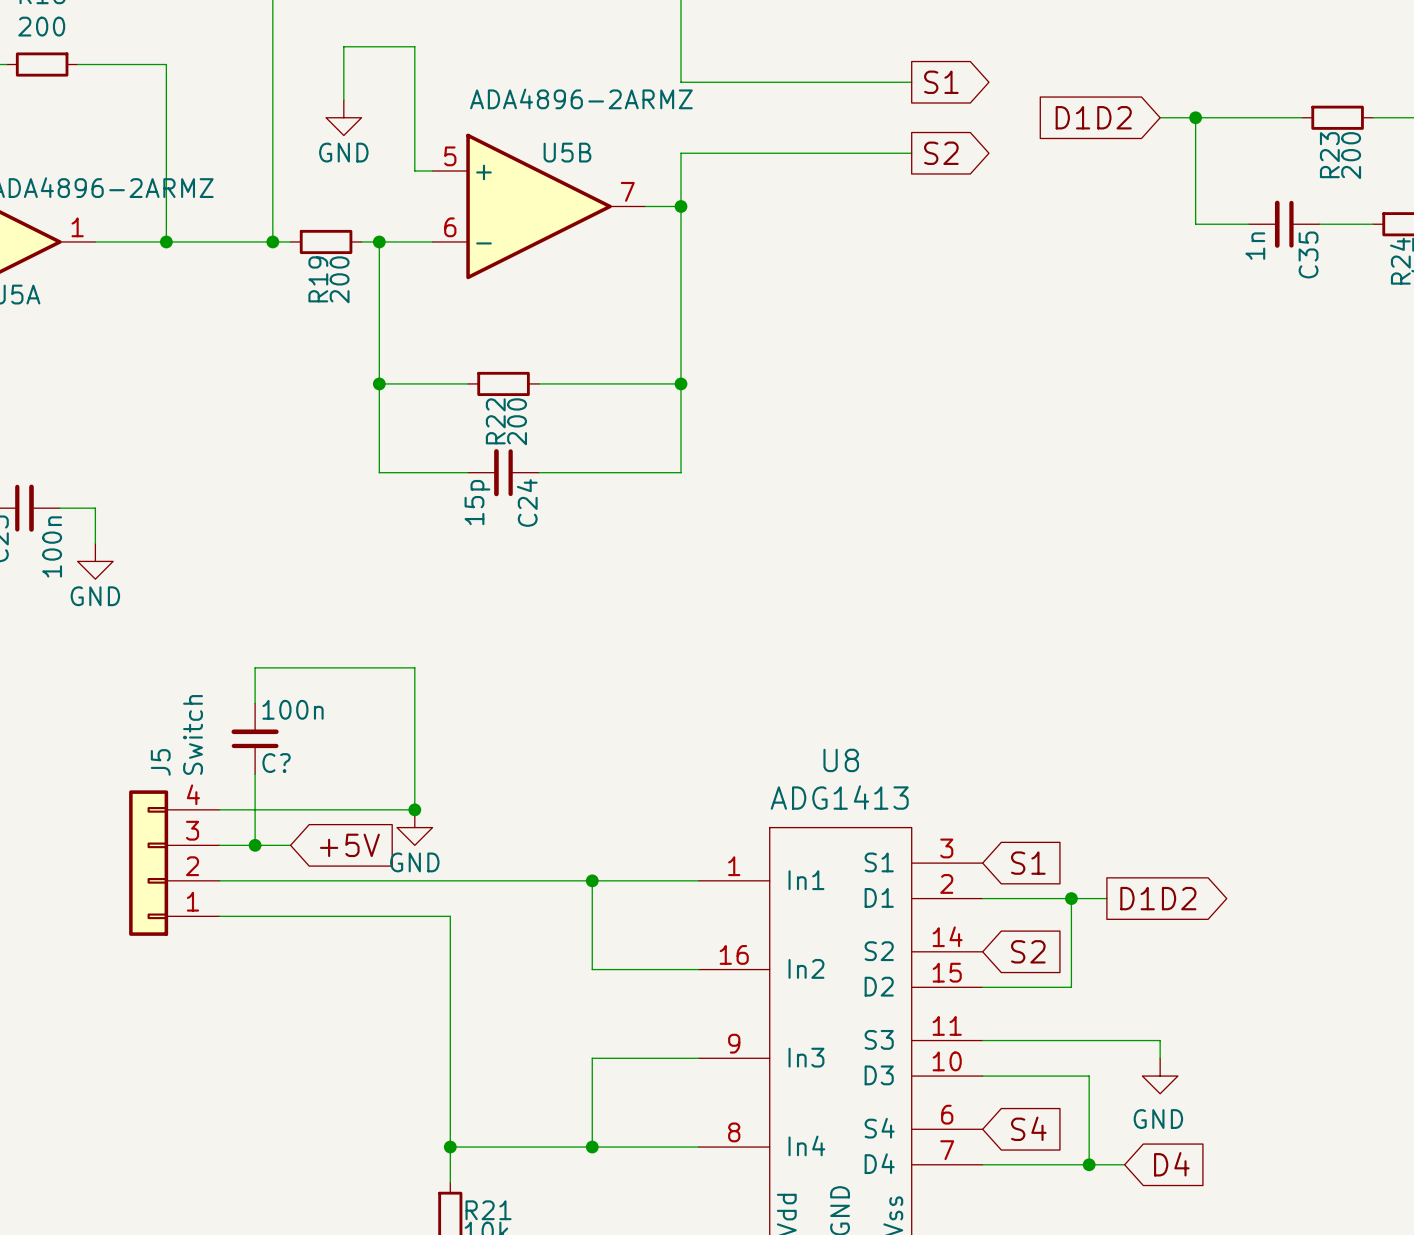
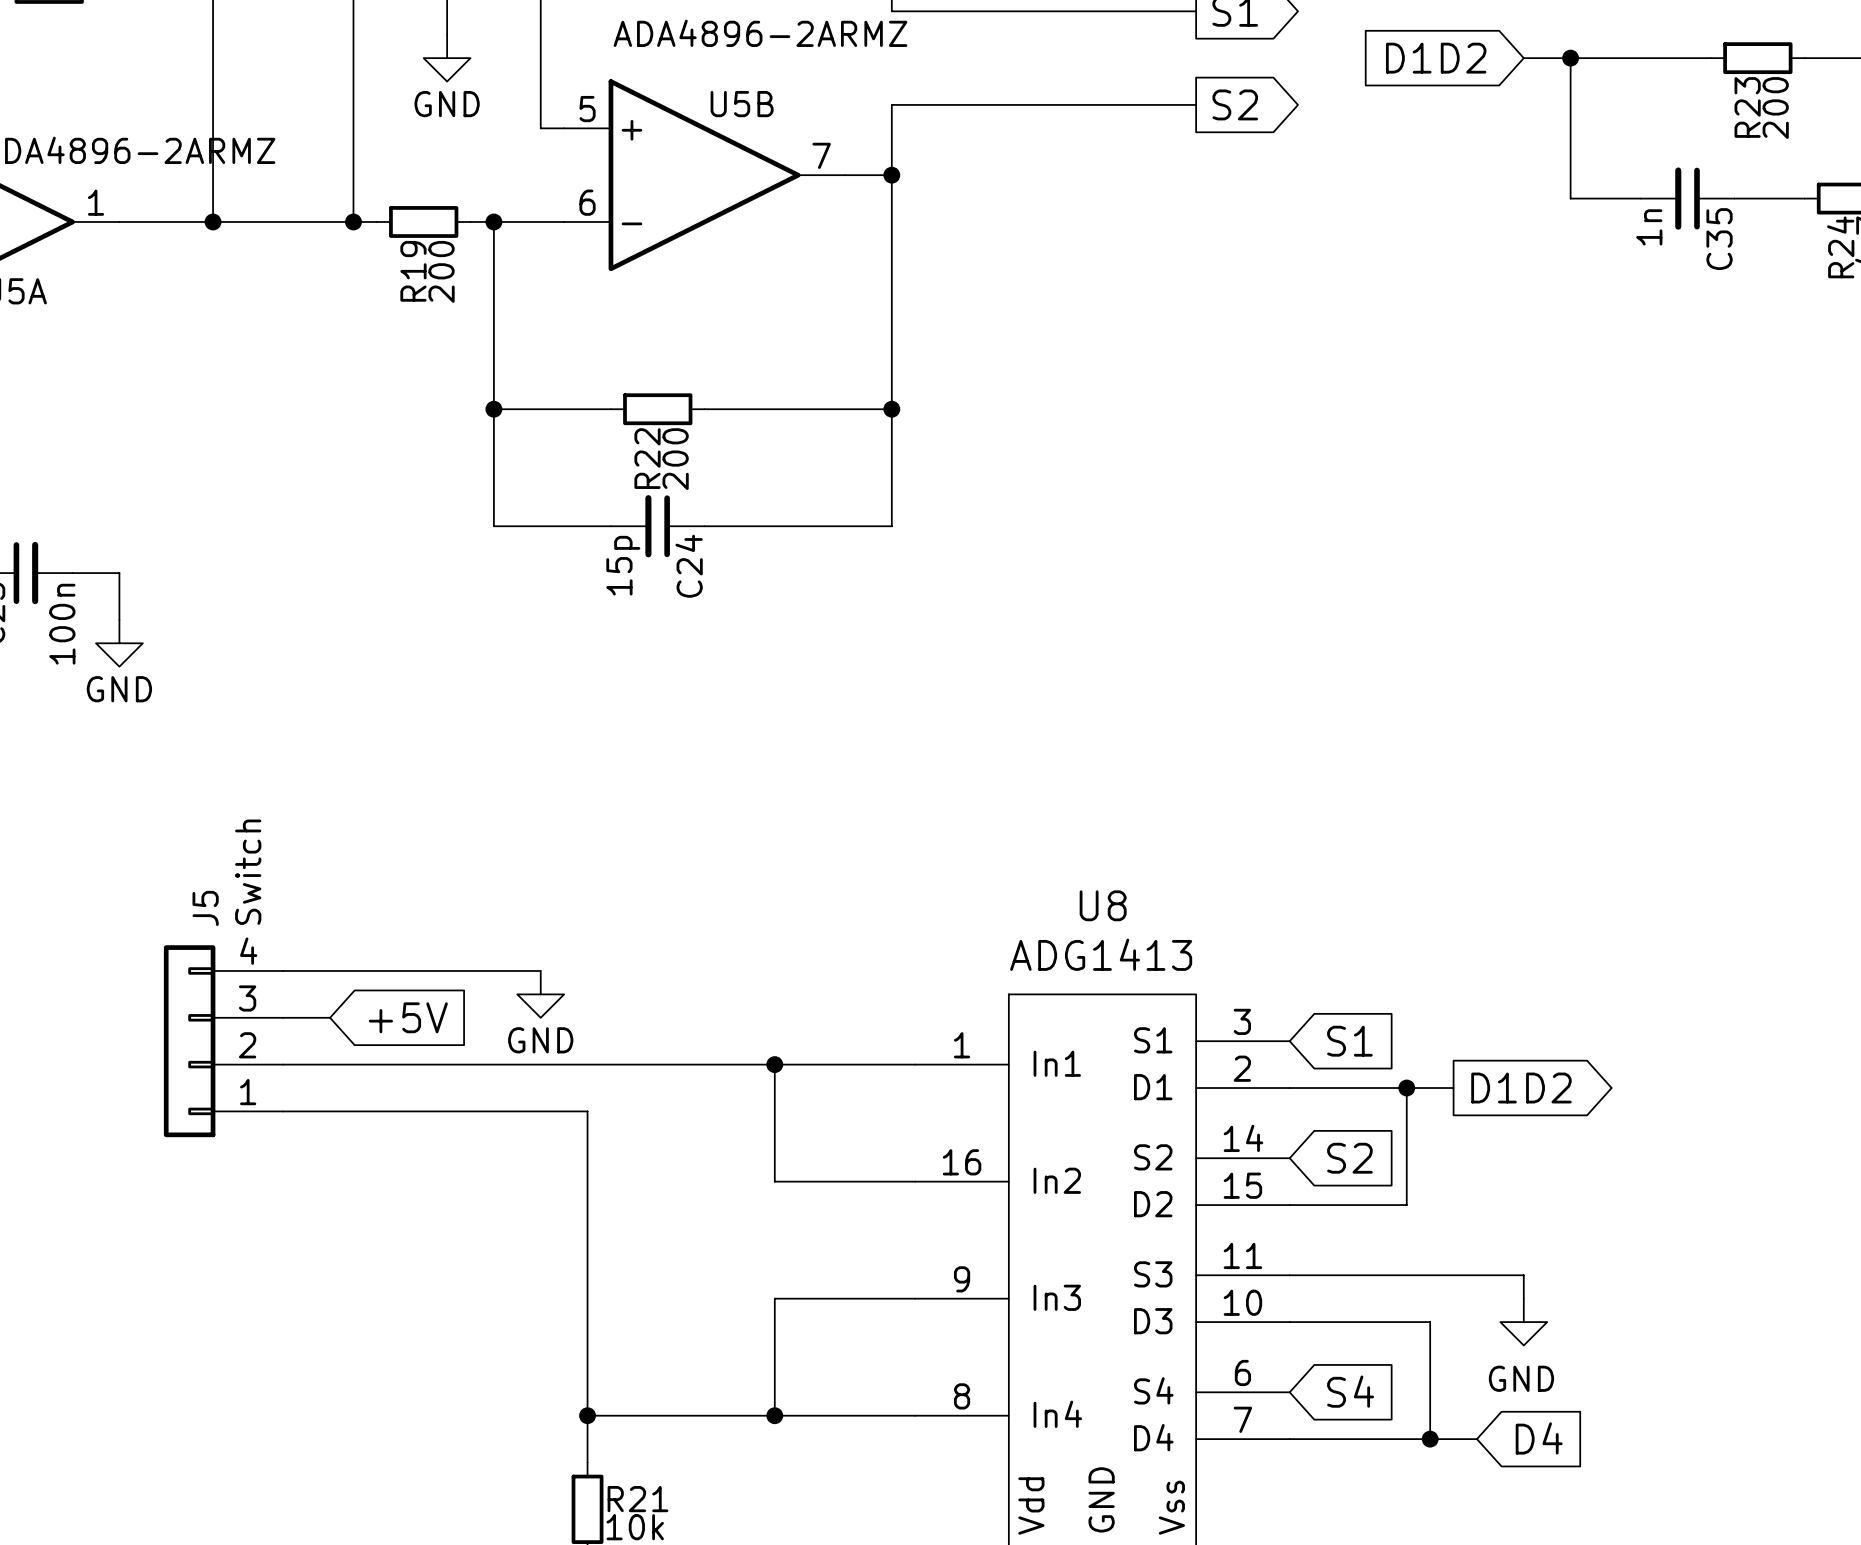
wire: (255, 703) (255, 667) (414, 667) (414, 809) -> none
C?: 100n (255, 738) -> none
wire: (255, 774) (255, 845) (290, 845) -> none
junction: (414, 809) -> none
junction: (255, 845) -> none
global label position: +5V (349, 845) -> +5V (408, 1017)

